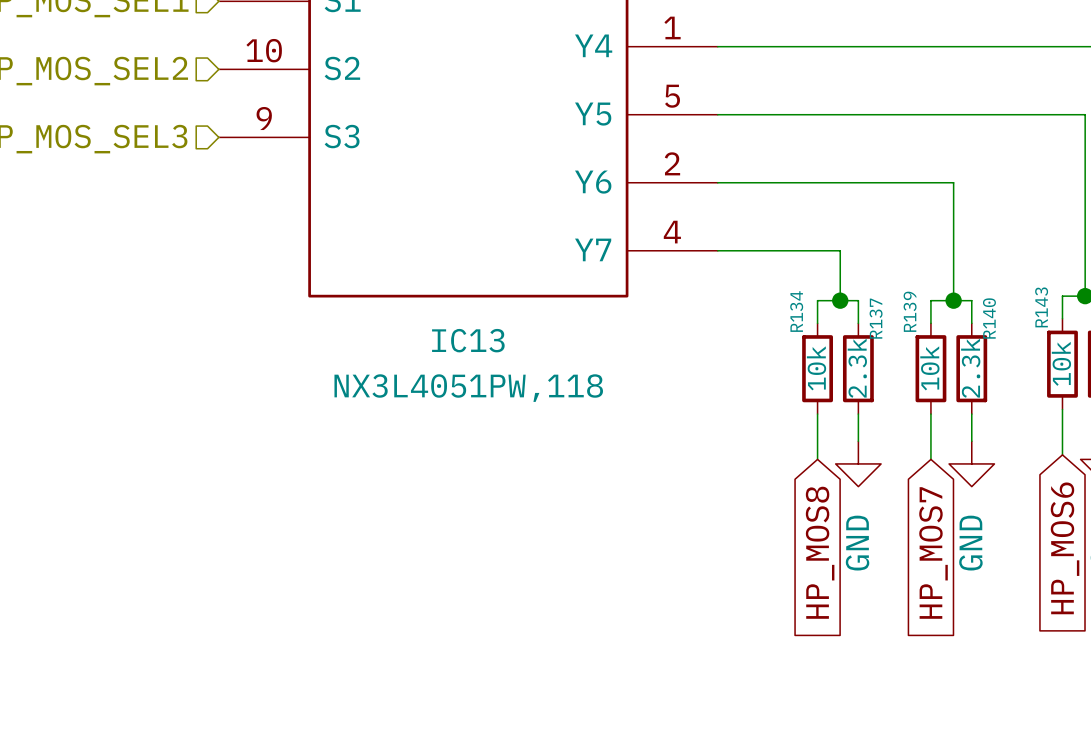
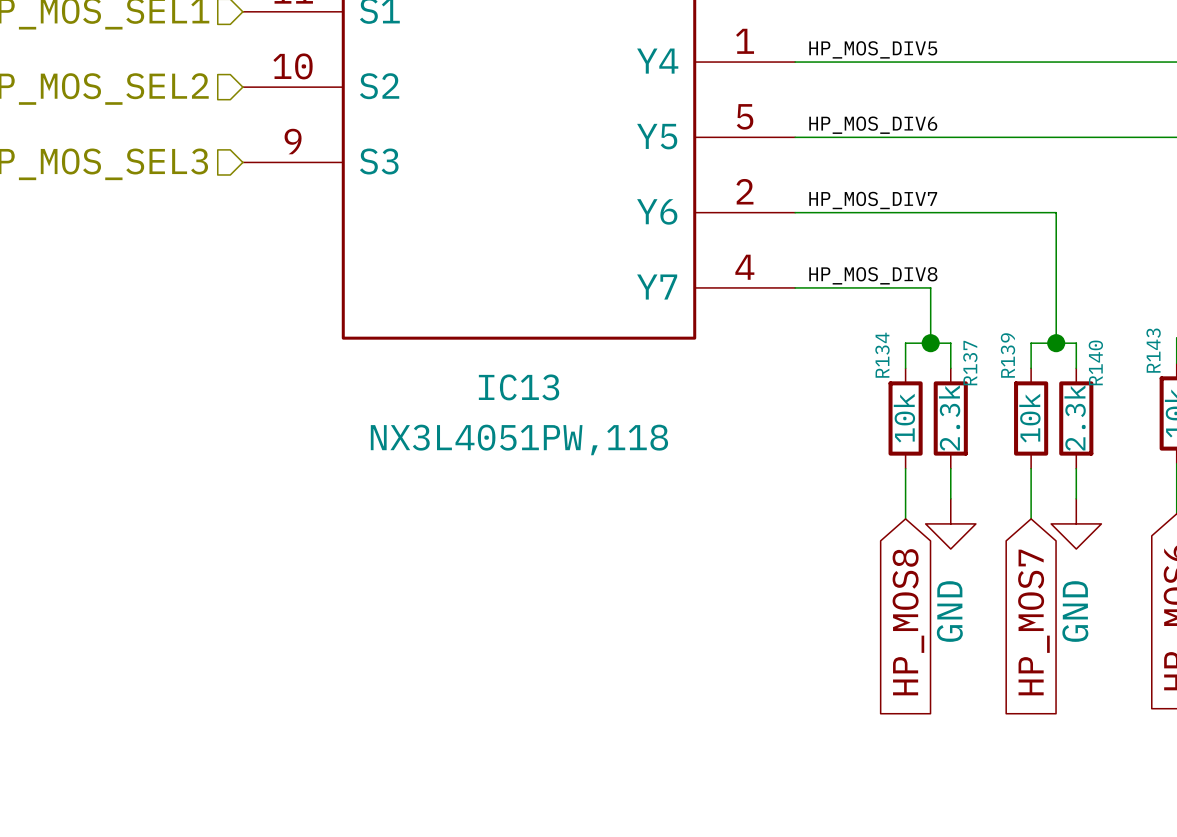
label: none -> HP_MOS_DIV5 (873, 49)
label: none -> HP_MOS_DIV6 (873, 125)
label: none -> HP_MOS_DIV7 (873, 200)
label: none -> HP_MOS_DIV8 (873, 275)

